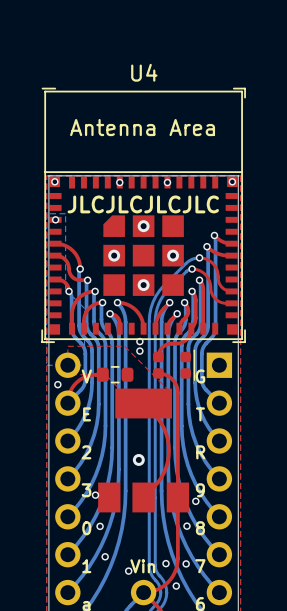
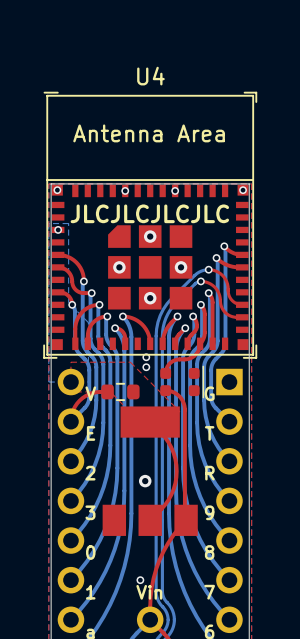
top track: (158, 373) (170, 377) (177, 390) (177, 562) (174, 573) (167, 582) (154, 590) (143, 592) -> (165, 390) (177, 394) (184, 407) (186, 520) (168, 542) (156, 569) (150, 597) (150, 619)
via: (57, 384) -> none
via: (95, 495) -> none
via: (195, 501) -> none
via: (100, 526) -> none
via: (186, 526) -> none
via: none -> (140, 580)
via: (105, 556) -> none
via: (165, 563) -> none
via: (186, 563) -> none
via: (128, 571) -> none
via: (176, 586) -> none

